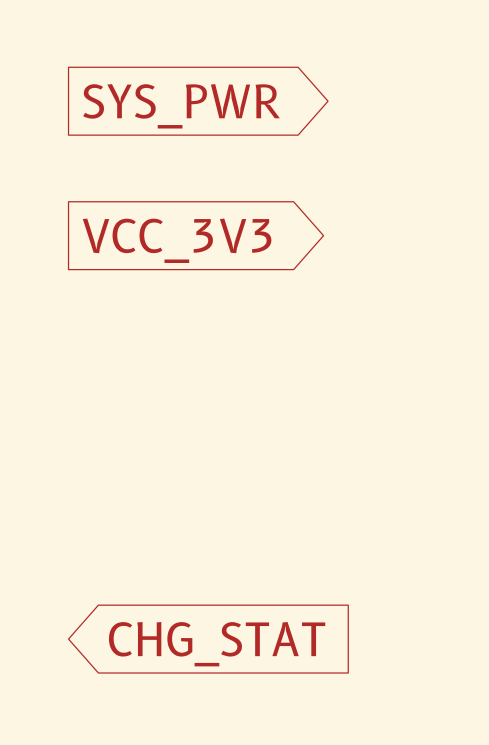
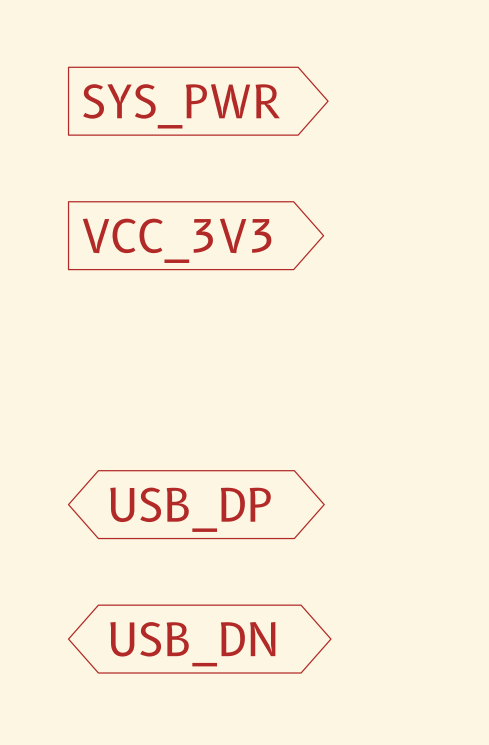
global label: none -> USB_DP (190, 509)
global label shape: input (217, 644) -> bidirectional (192, 644)
global label: CHG_STAT (217, 644) -> USB_DN (192, 644)

